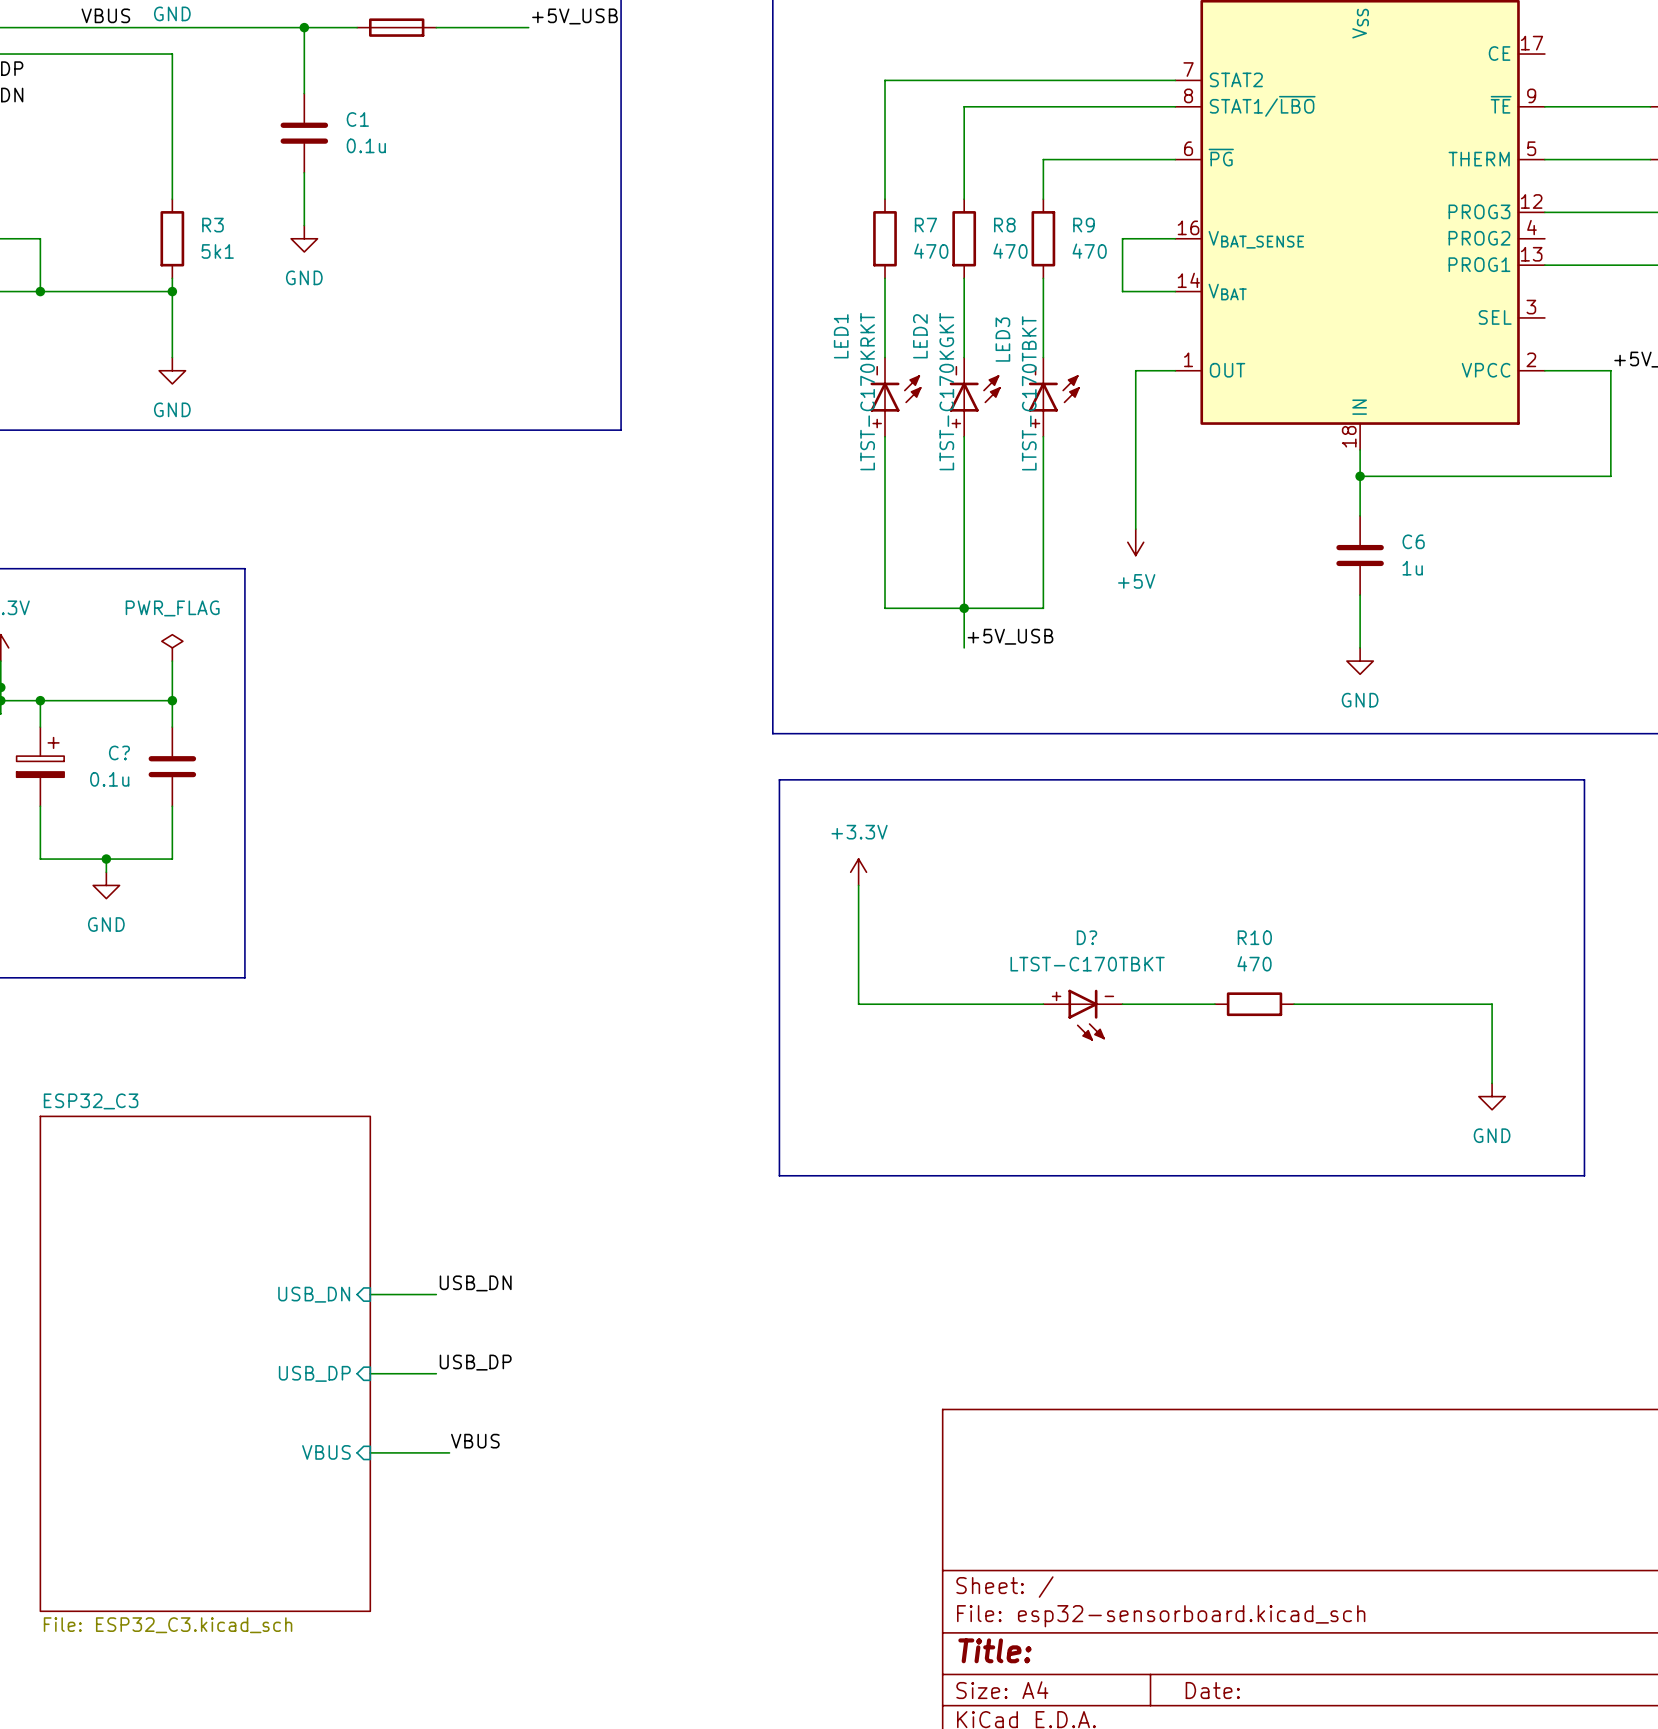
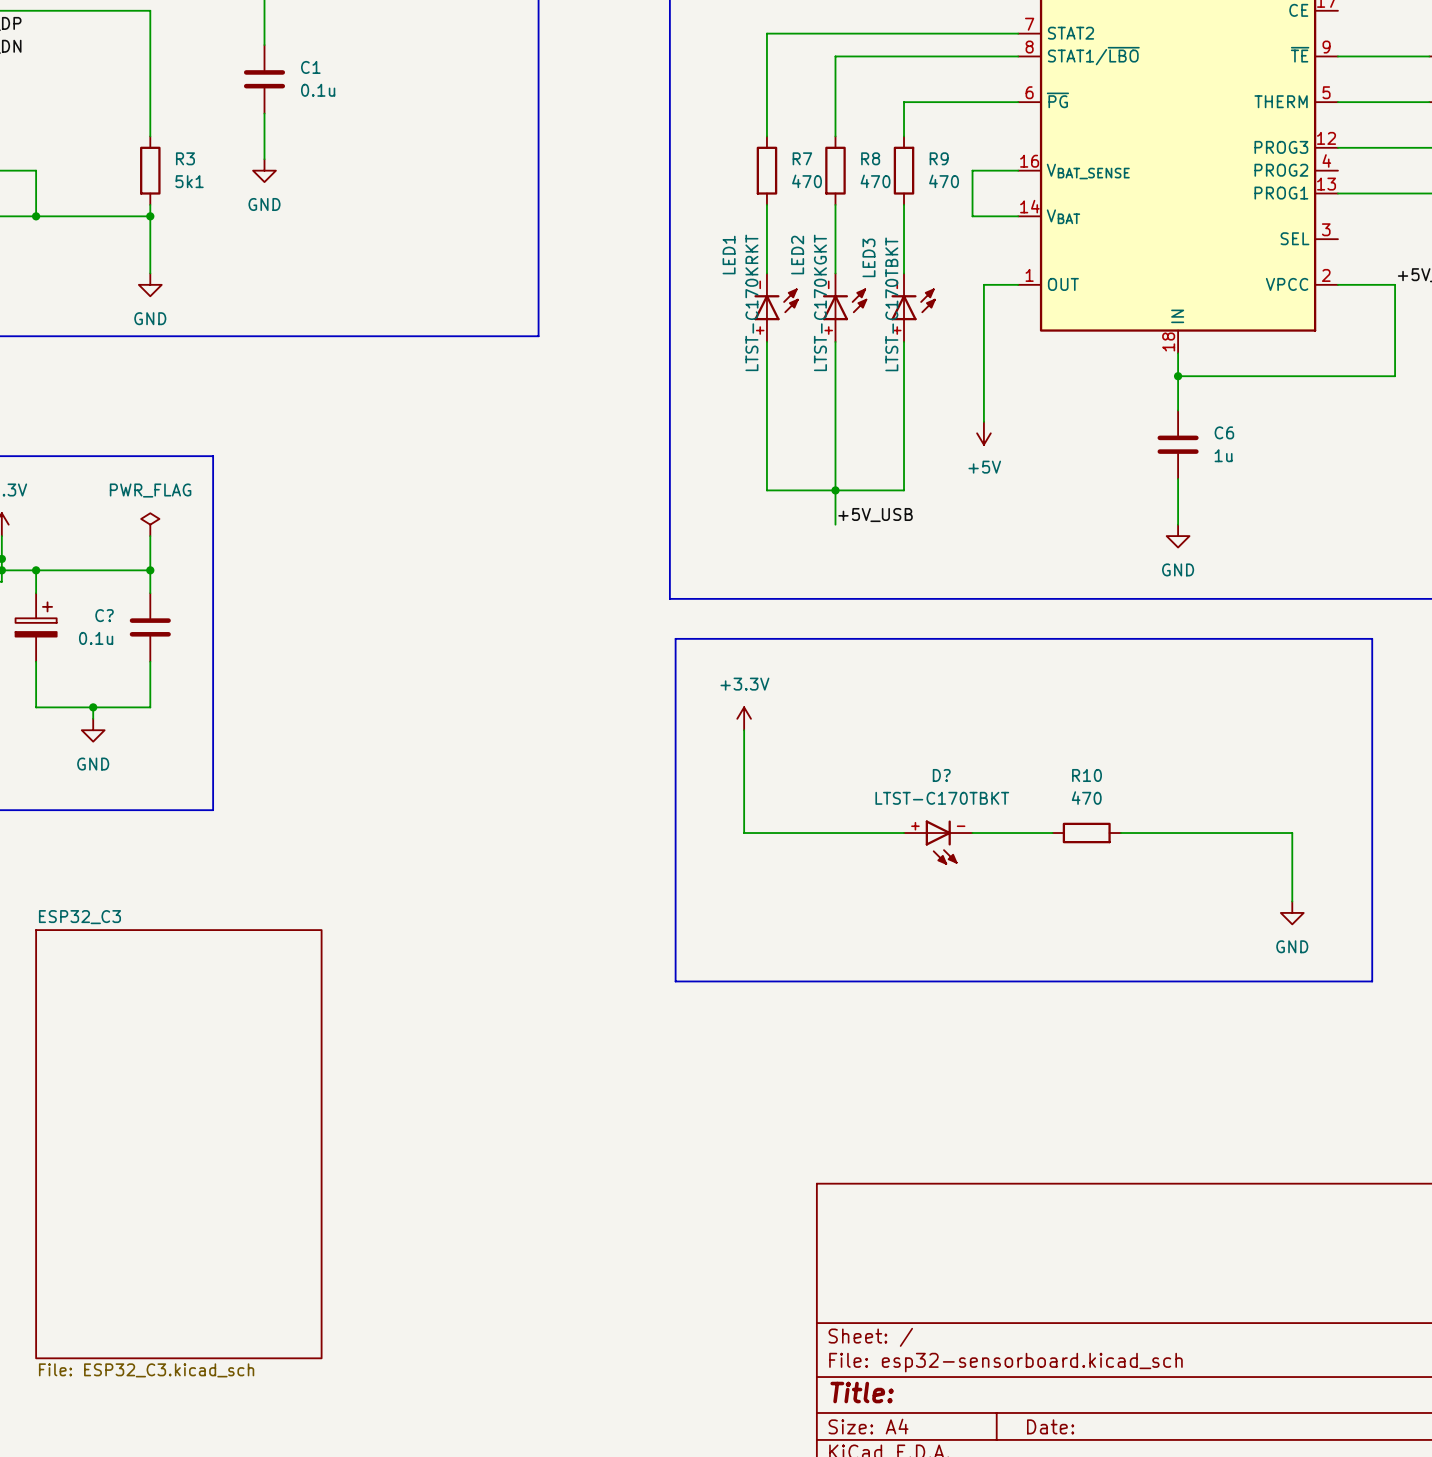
label: USB_DN (475, 1283) -> none
sheet pin: USB_DN (314, 1294) -> none
wire: (370, 1294) (436, 1294) -> none
label: USB_DP (475, 1362) -> none
sheet pin: USB_DP (314, 1373) -> none
wire: (370, 1373) (436, 1373) -> none
label: VBUS (475, 1441) -> none
sheet pin: VBUS (326, 1452) -> none
wire: (370, 1452) (449, 1452) -> none

